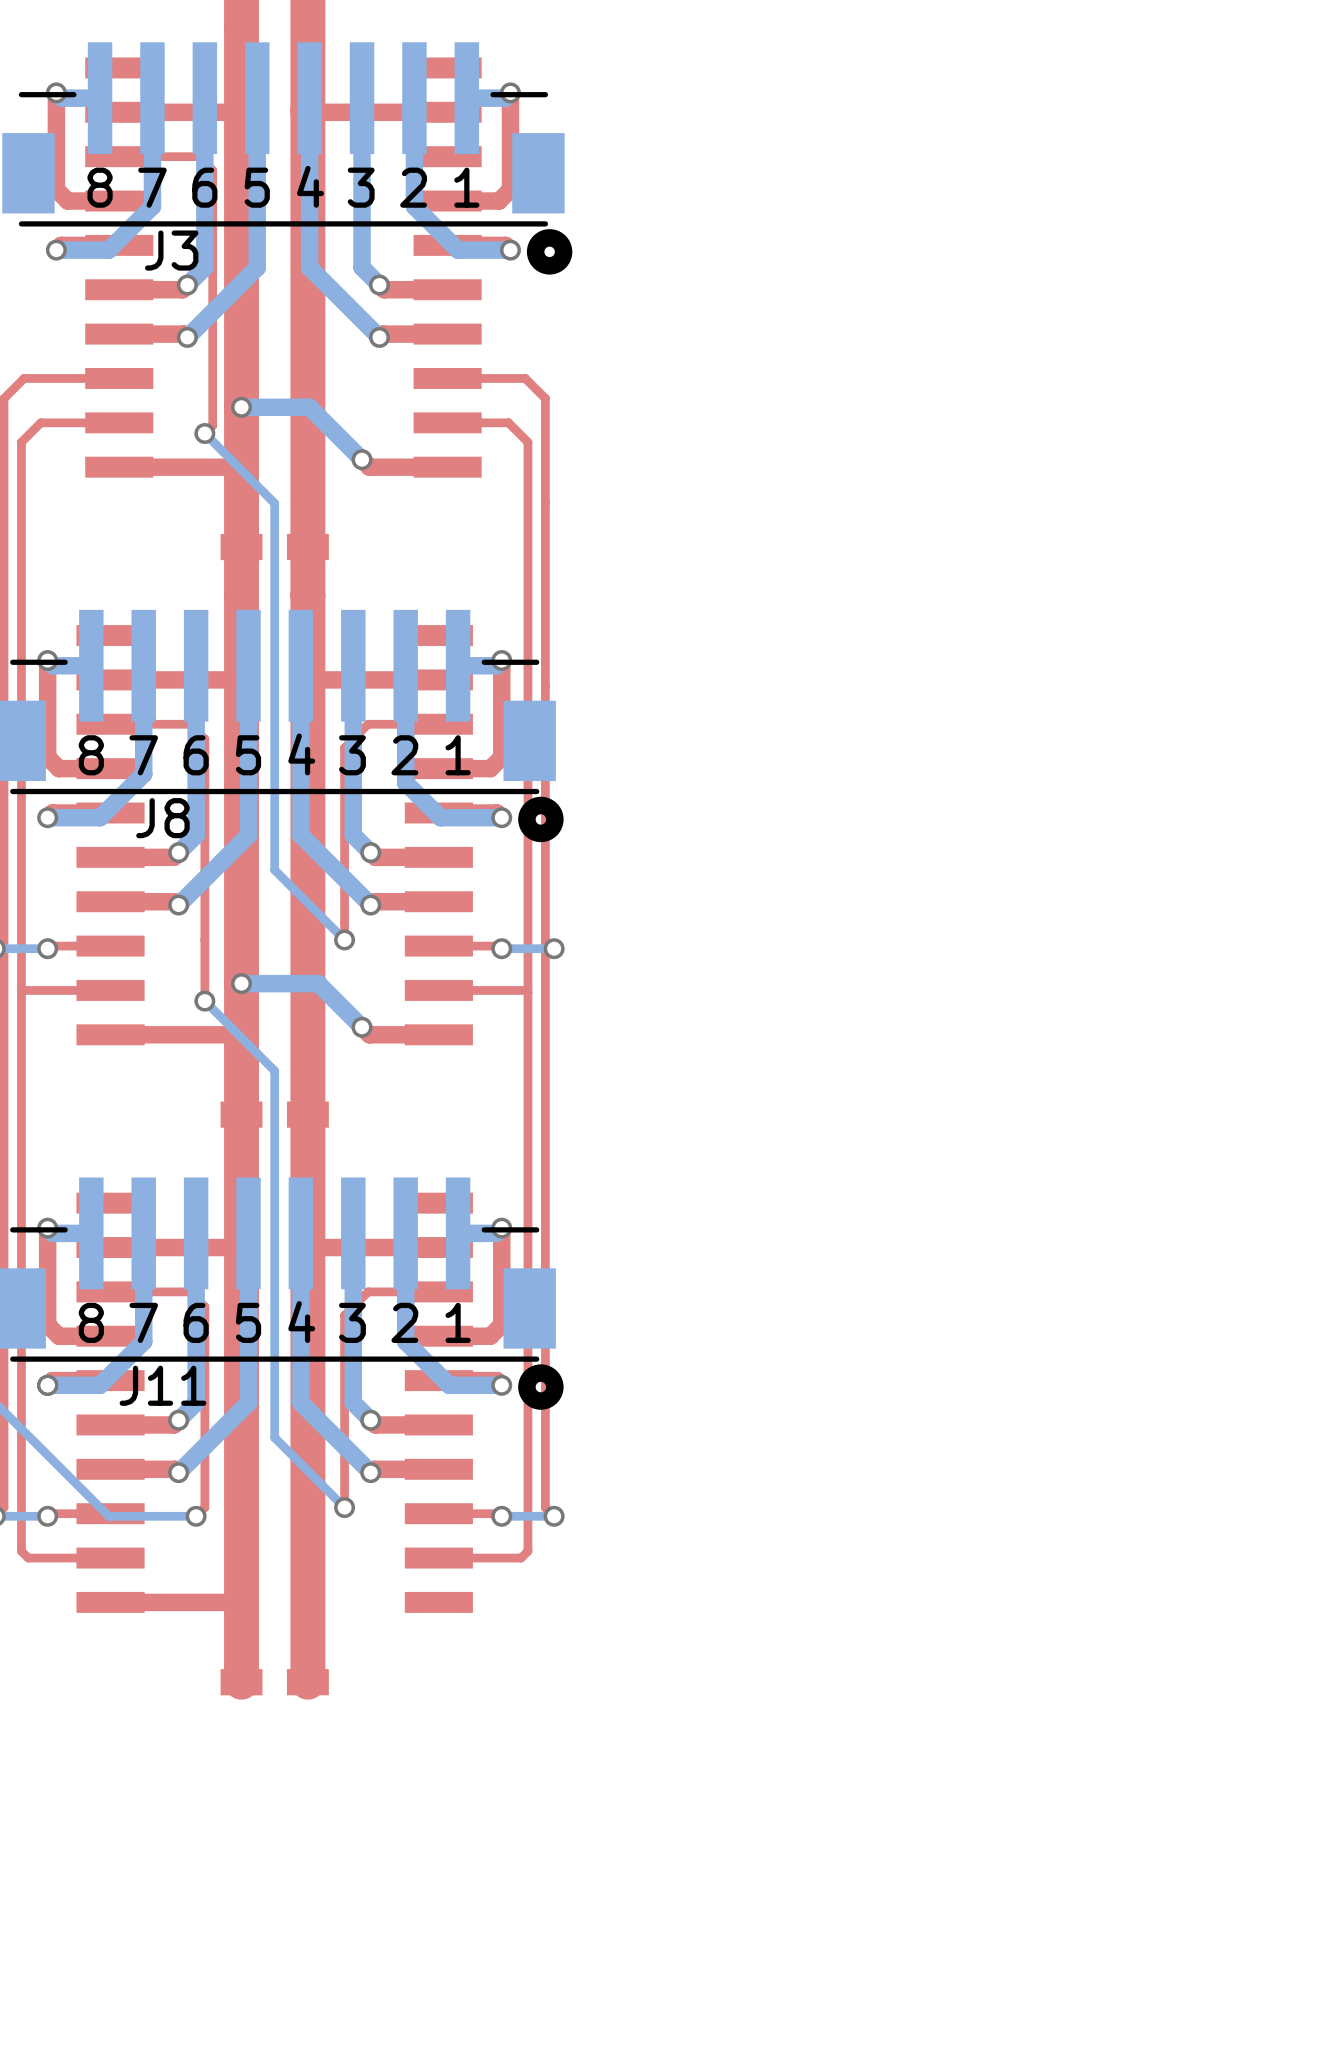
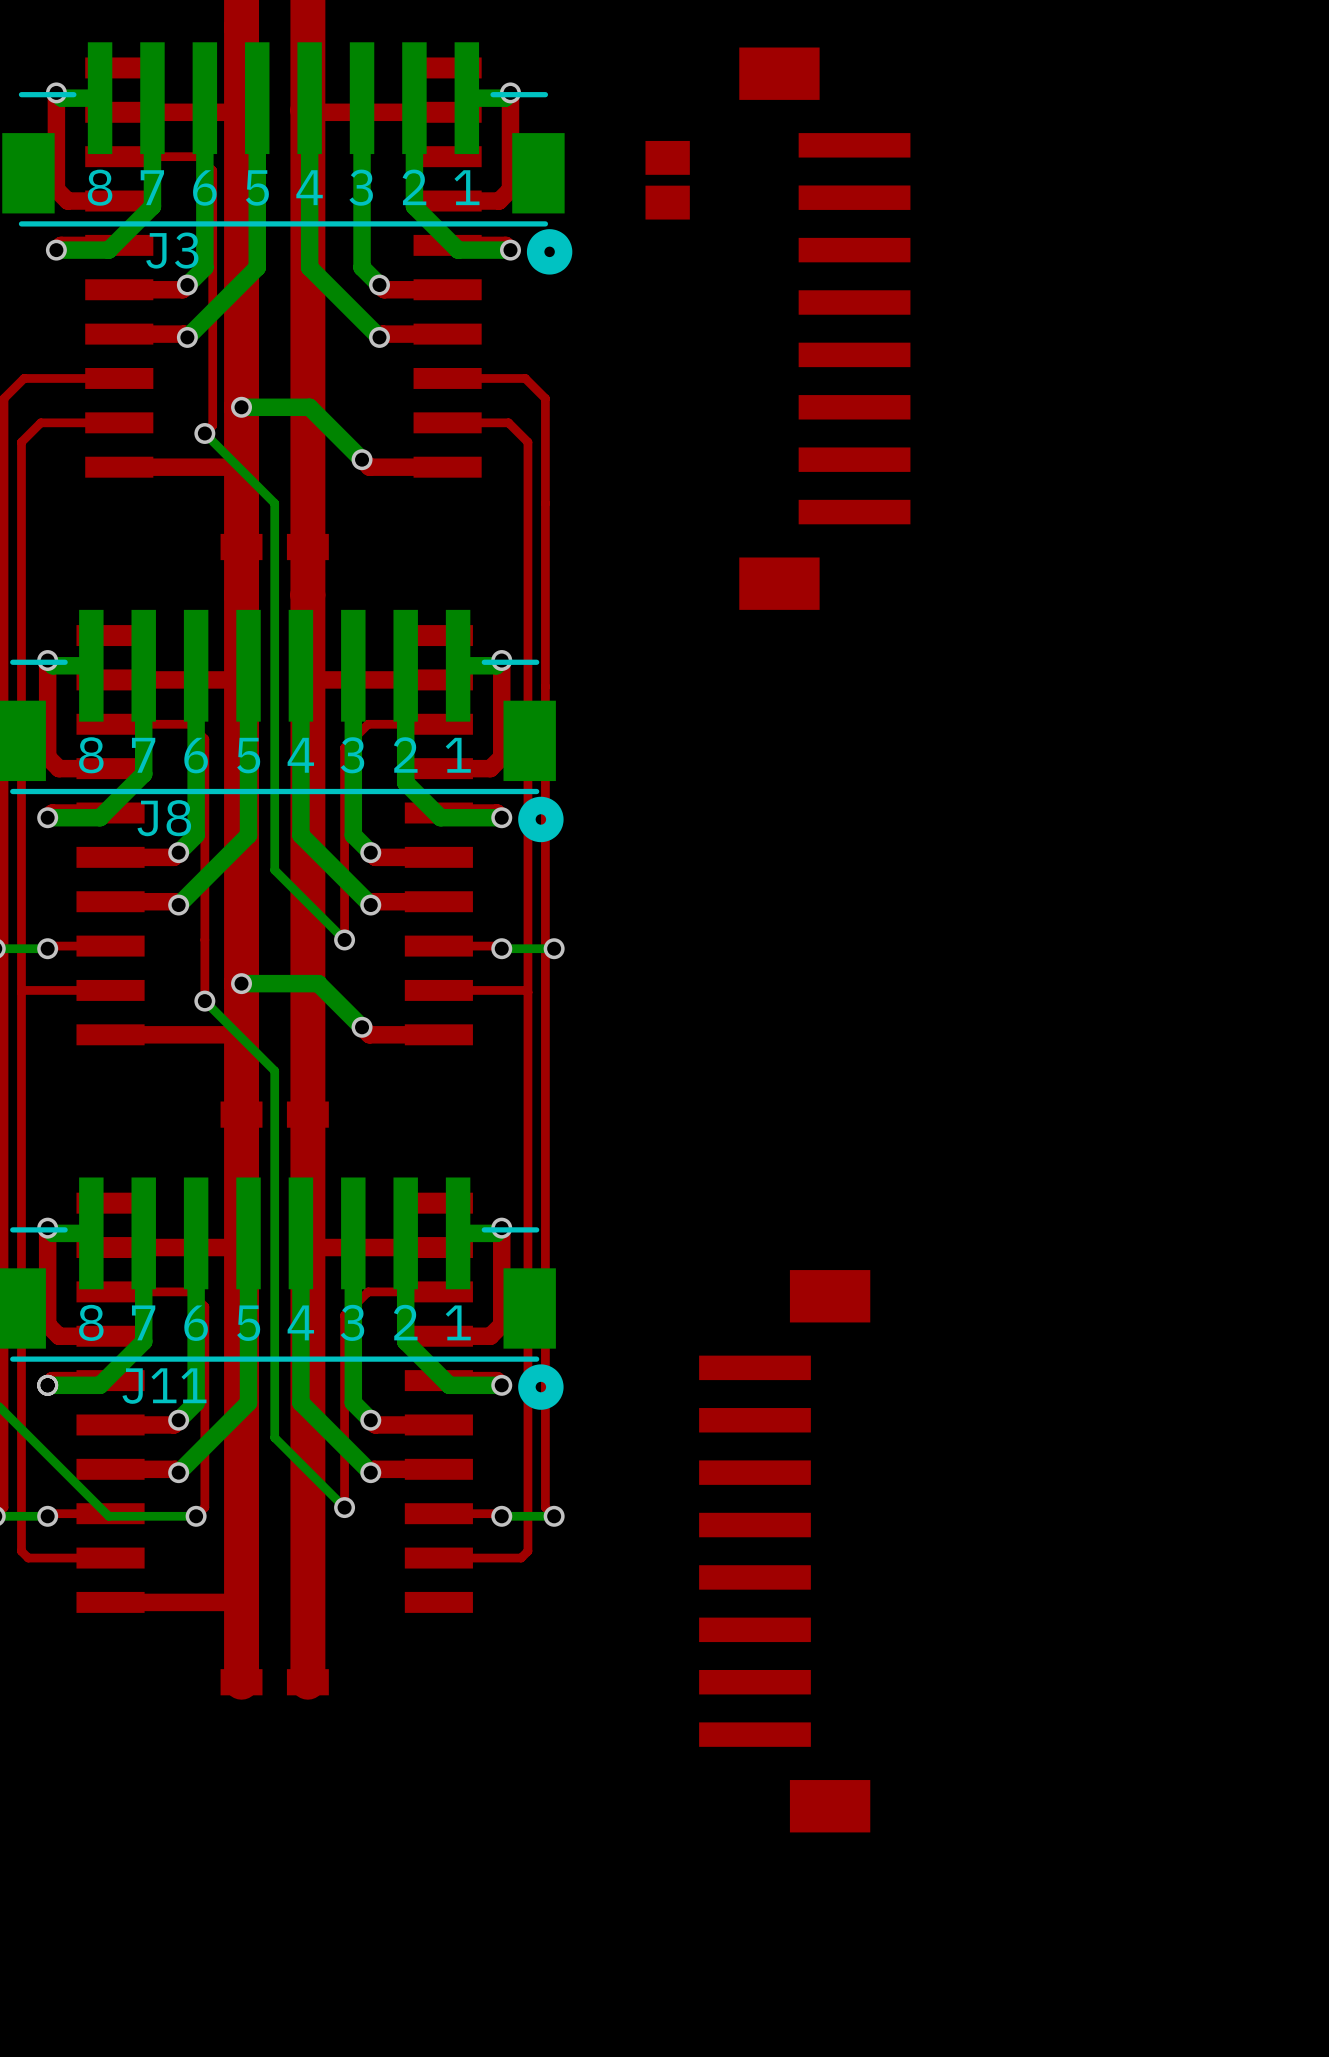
part: none -> (667, 180)
part: none -> (824, 328)
part: none -> (784, 1551)

